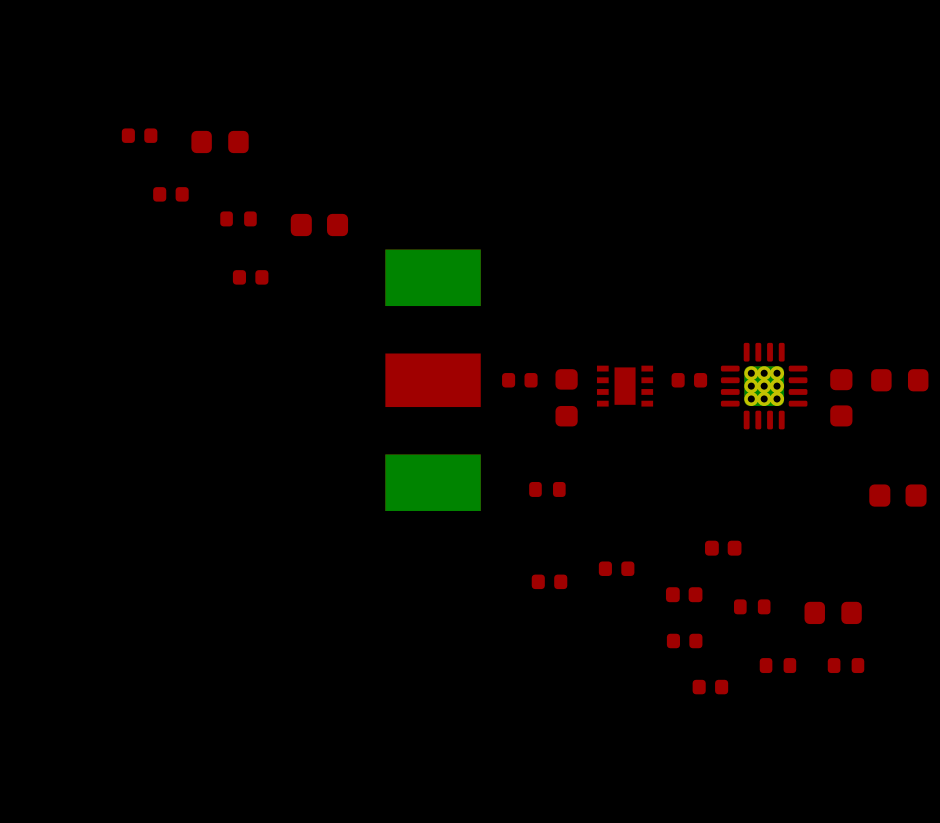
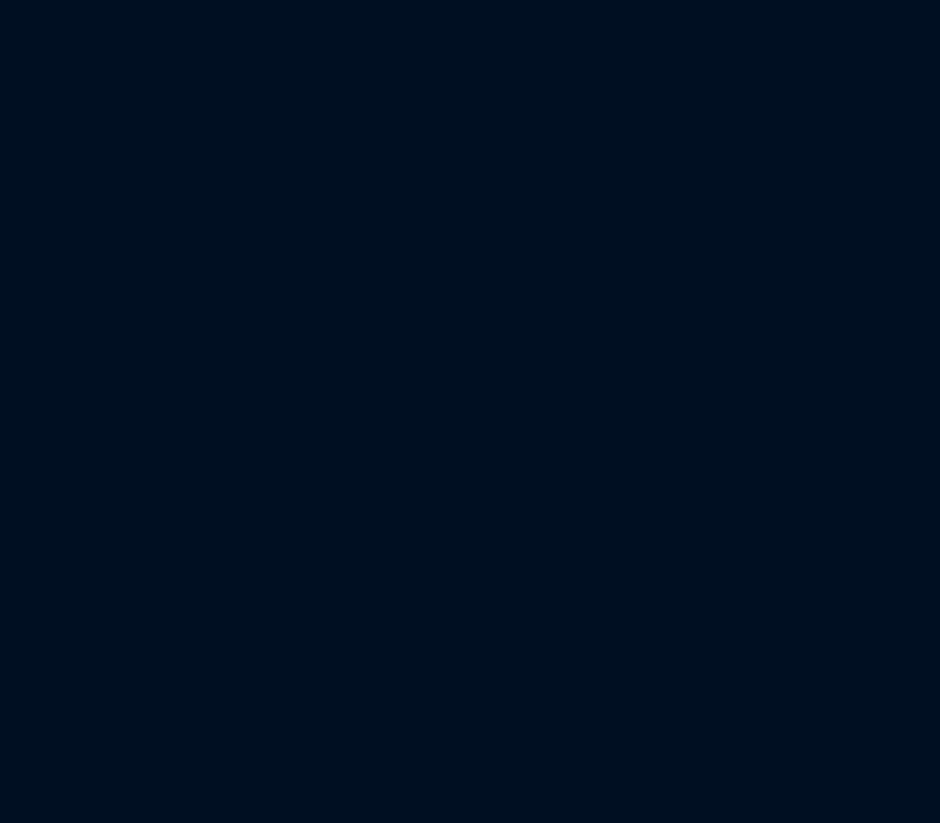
part: (139, 135) -> none
part: (220, 141) -> none
part: (170, 194) -> none
part: (238, 218) -> none
part: (319, 225) -> none
part: (250, 277) -> none
part: (433, 380) -> none
part: (519, 380) -> none
part: (689, 380) -> none
part: (899, 380) -> none
part: (625, 386) -> none
part: (764, 386) -> none
part: (566, 397) -> none
part: (841, 397) -> none
part: (547, 489) -> none
part: (897, 495) -> none
part: (723, 548) -> none
part: (616, 568) -> none
part: (549, 581) -> none
part: (684, 594) -> none
part: (752, 606) -> none
part: (833, 612) -> none
part: (684, 640) -> none
part: (777, 665) -> none
part: (846, 665) -> none
part: (710, 687) -> none

